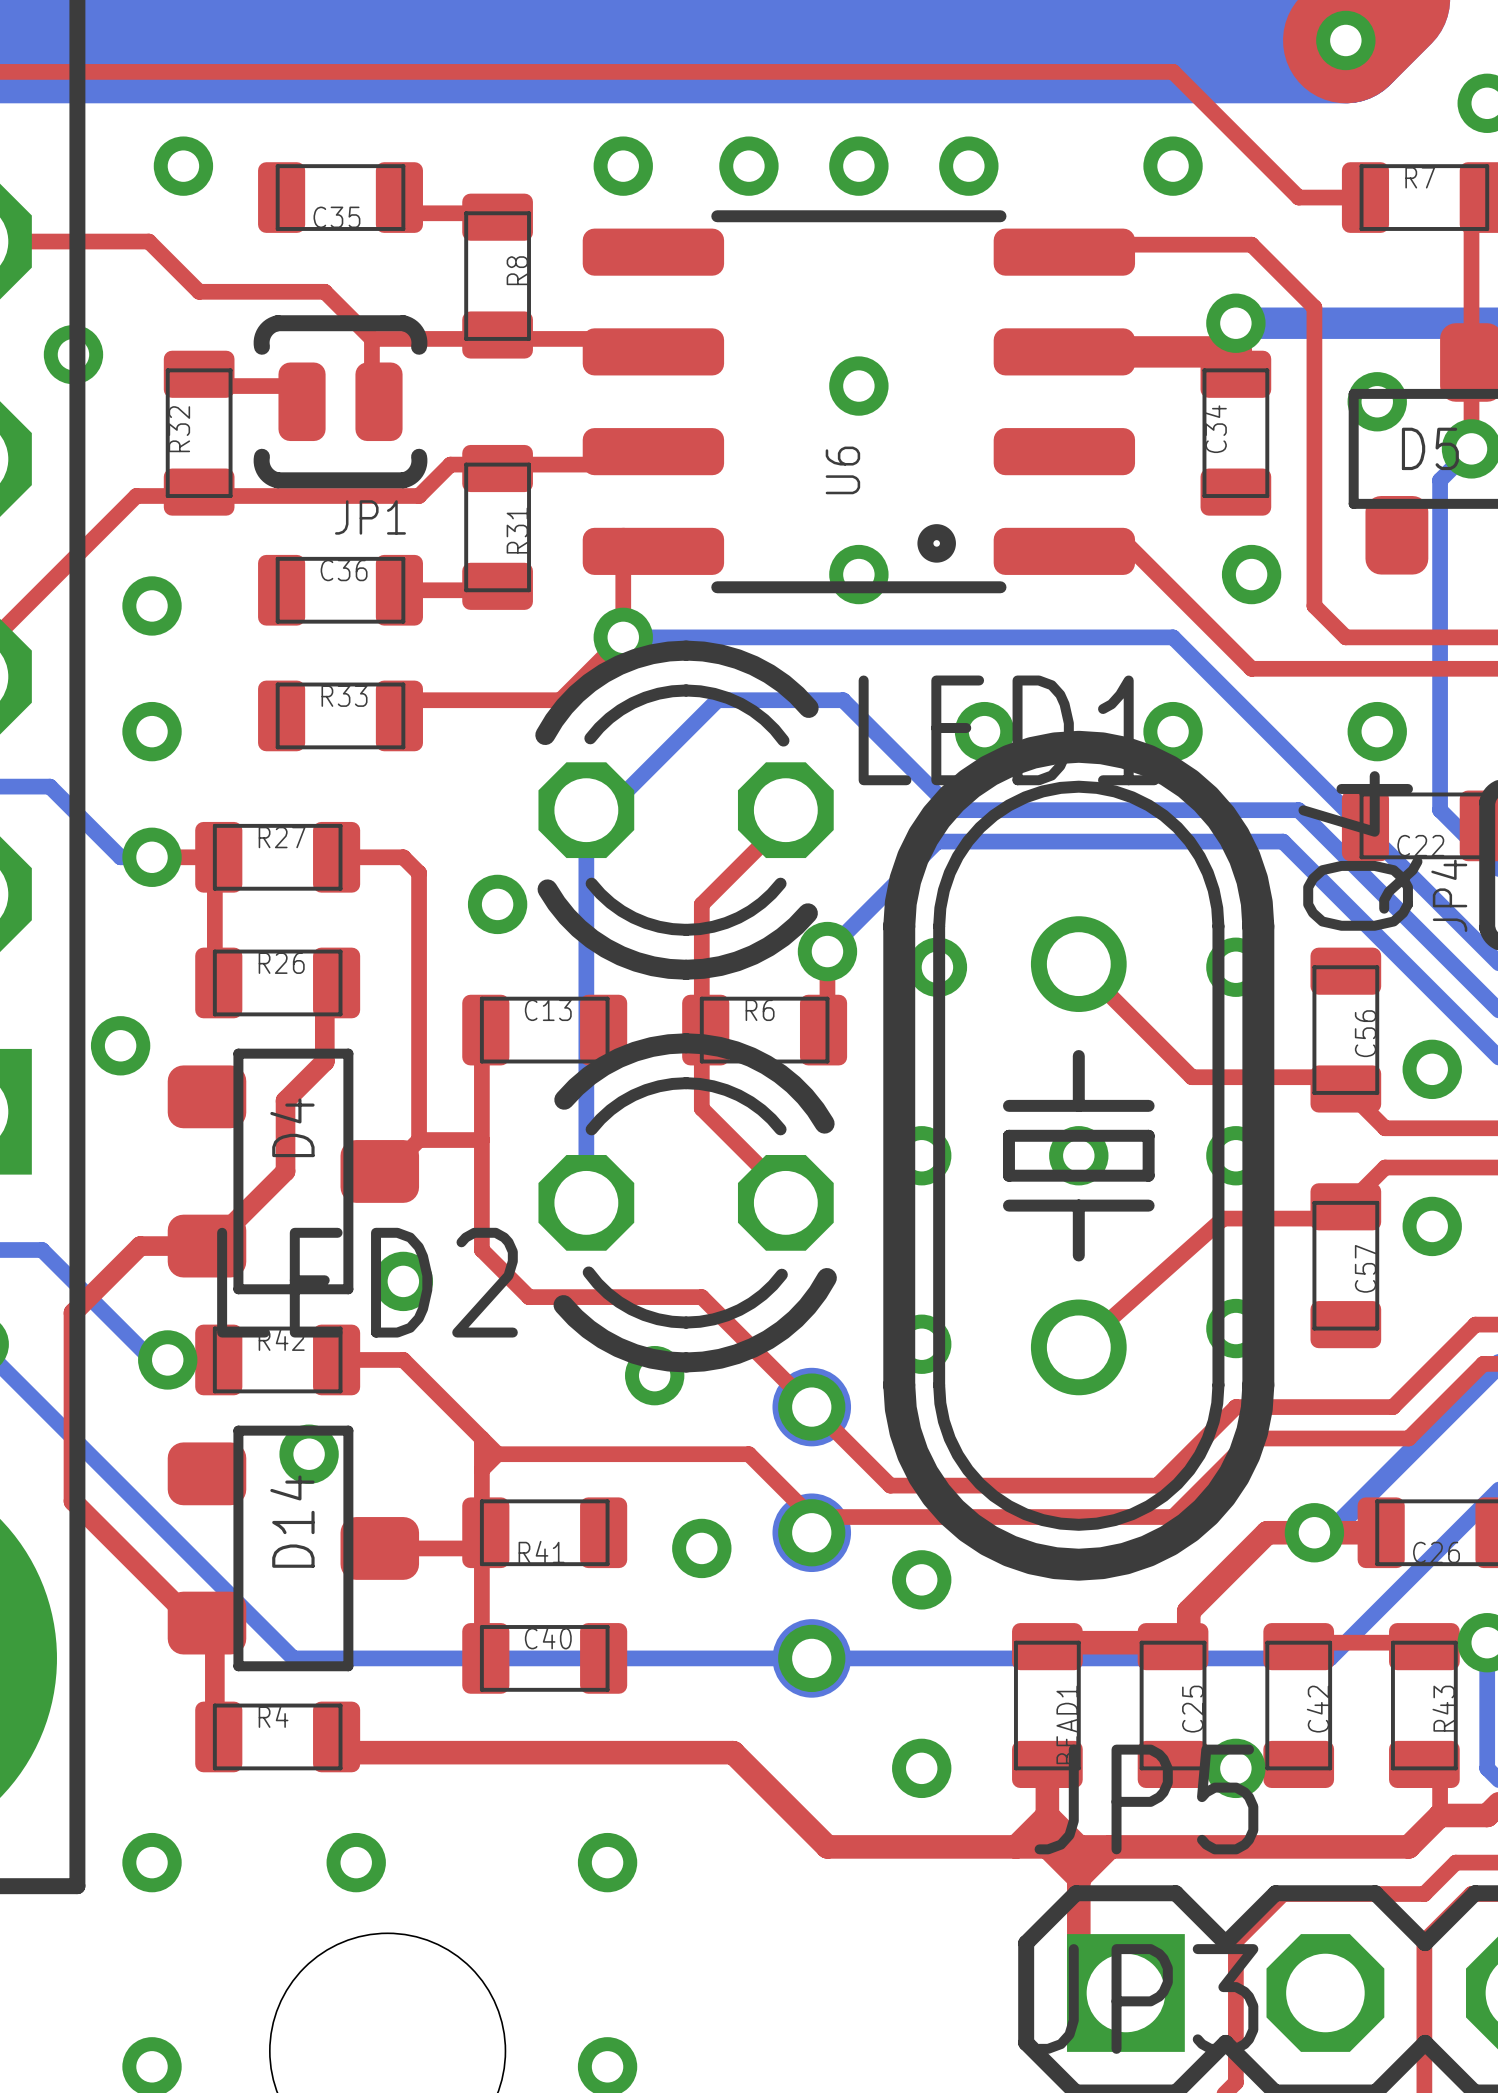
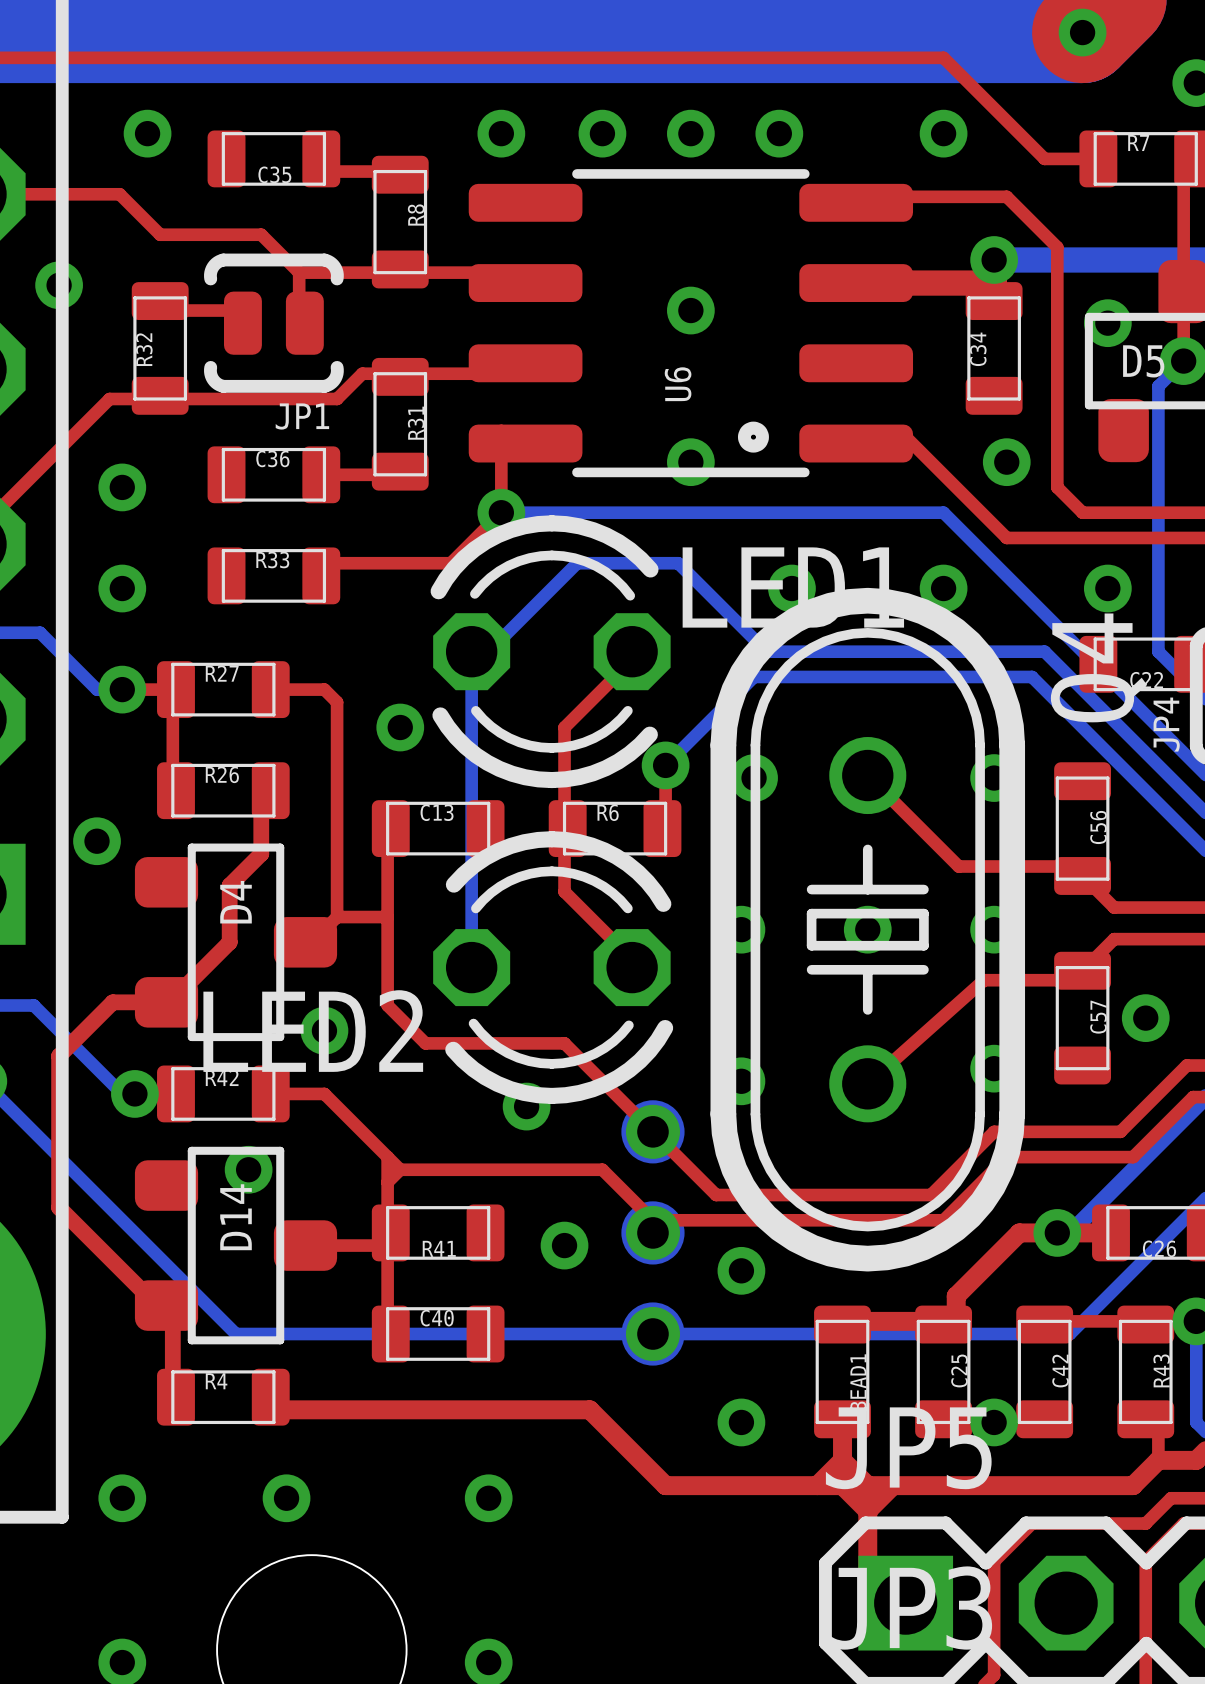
via: (1432, 1069) -> none
via position: (1432, 1226) -> (1145, 1018)

